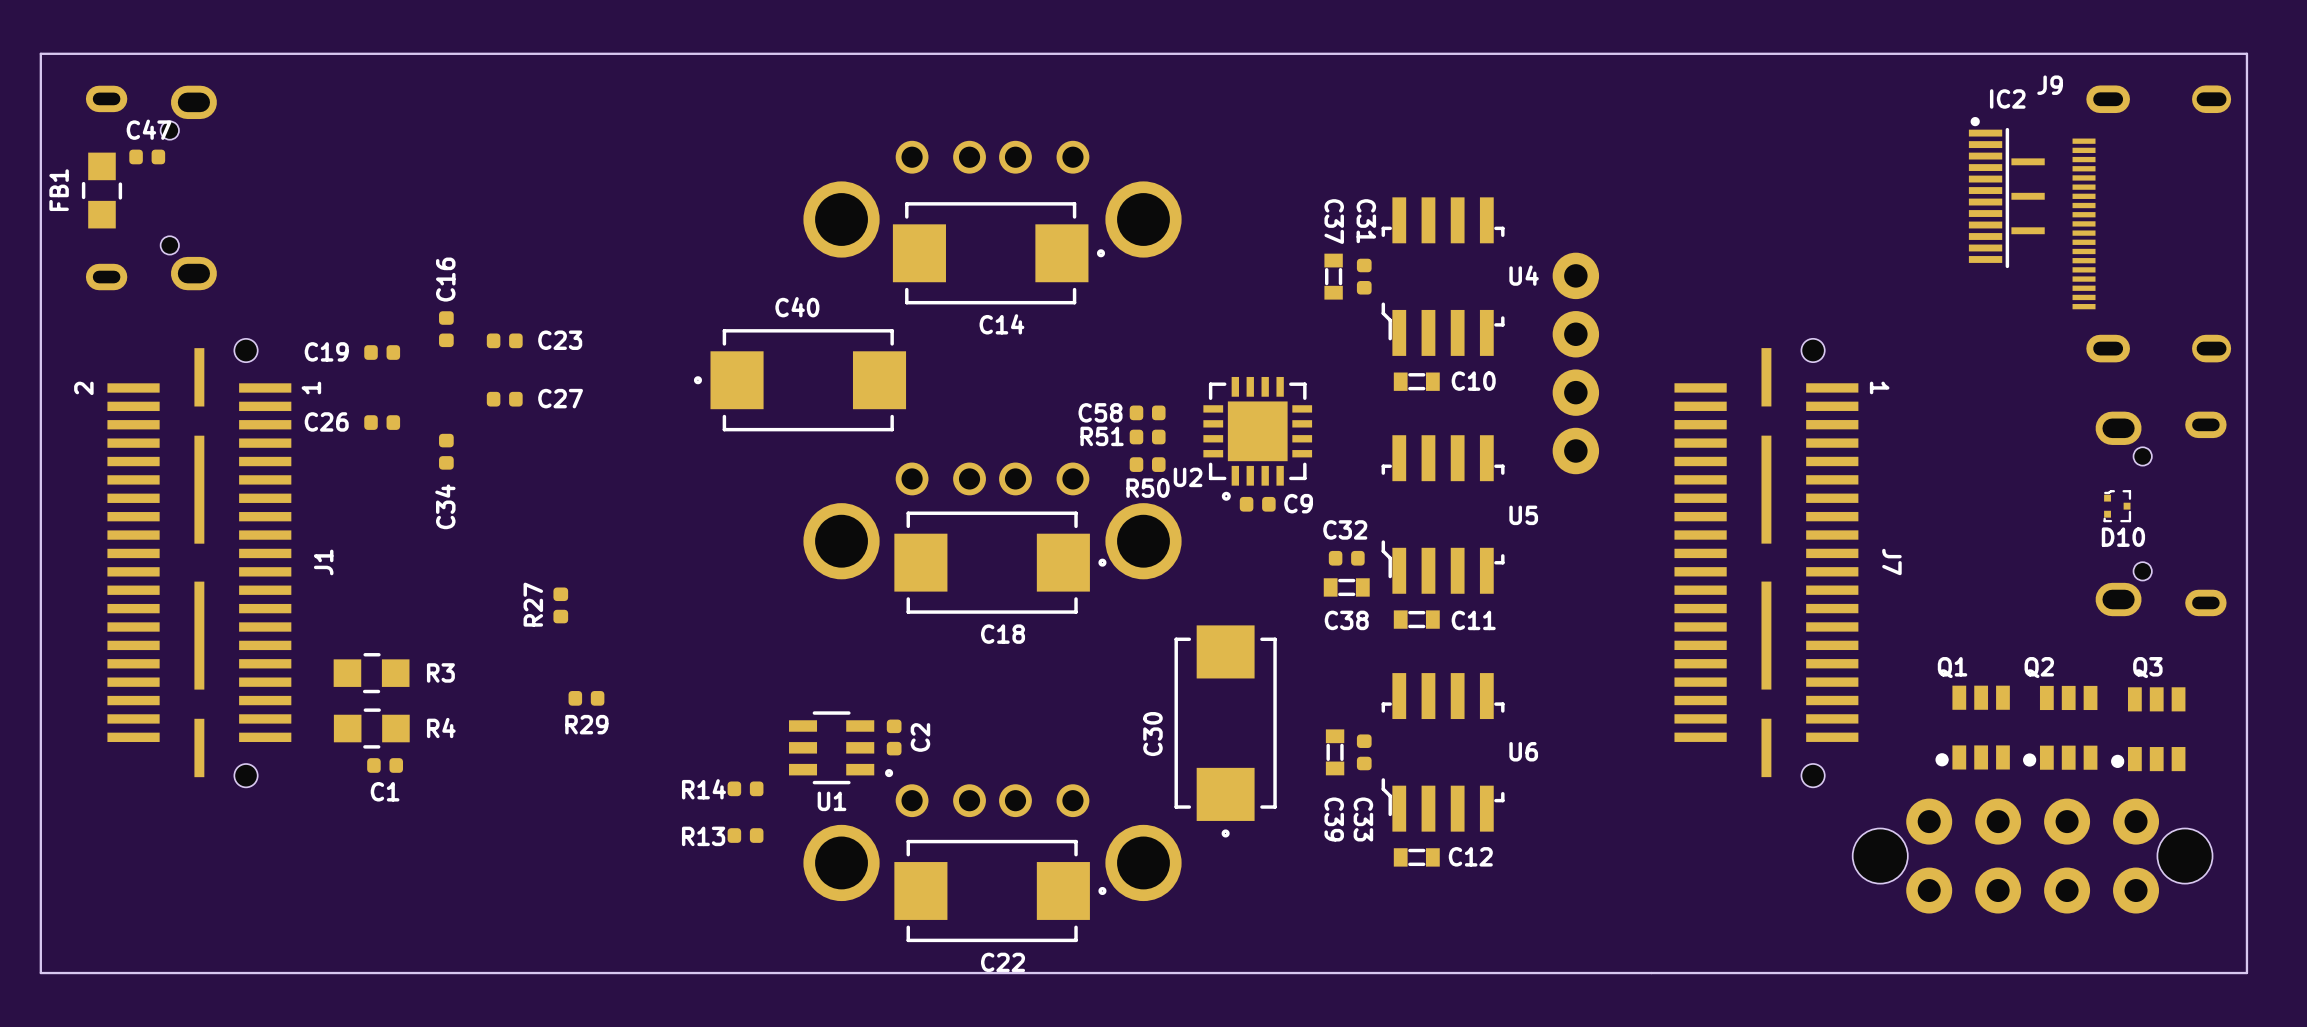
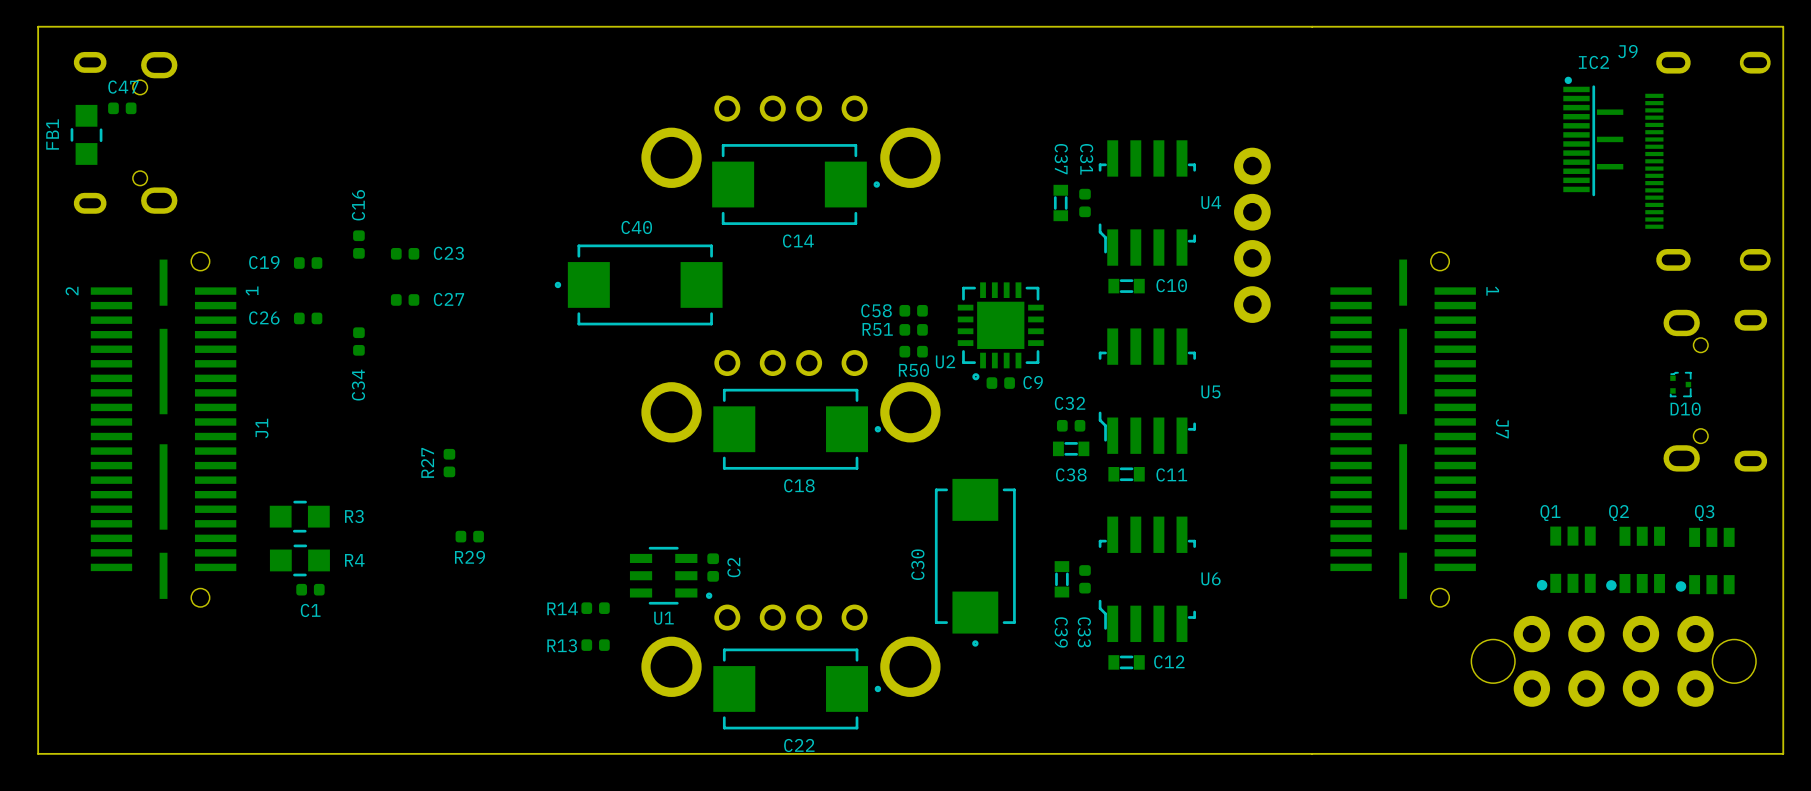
part position: (1575, 363) -> (1252, 235)

